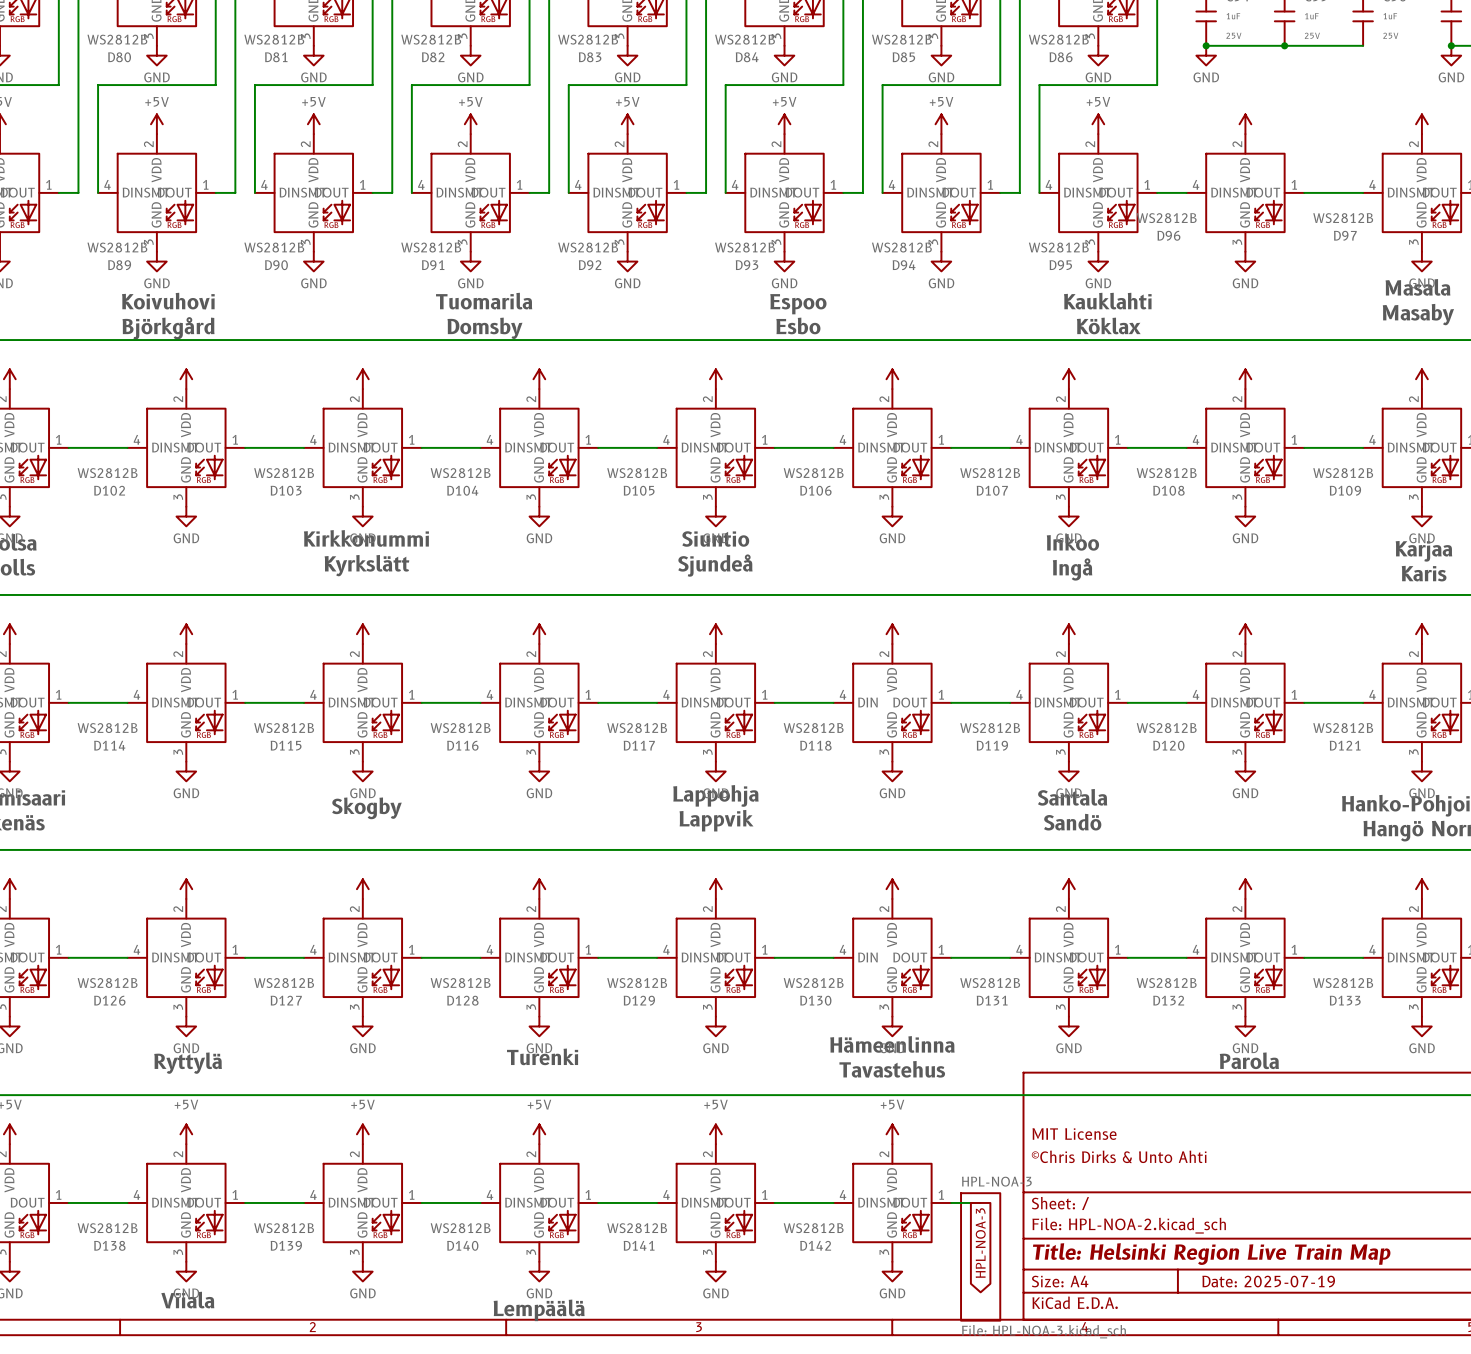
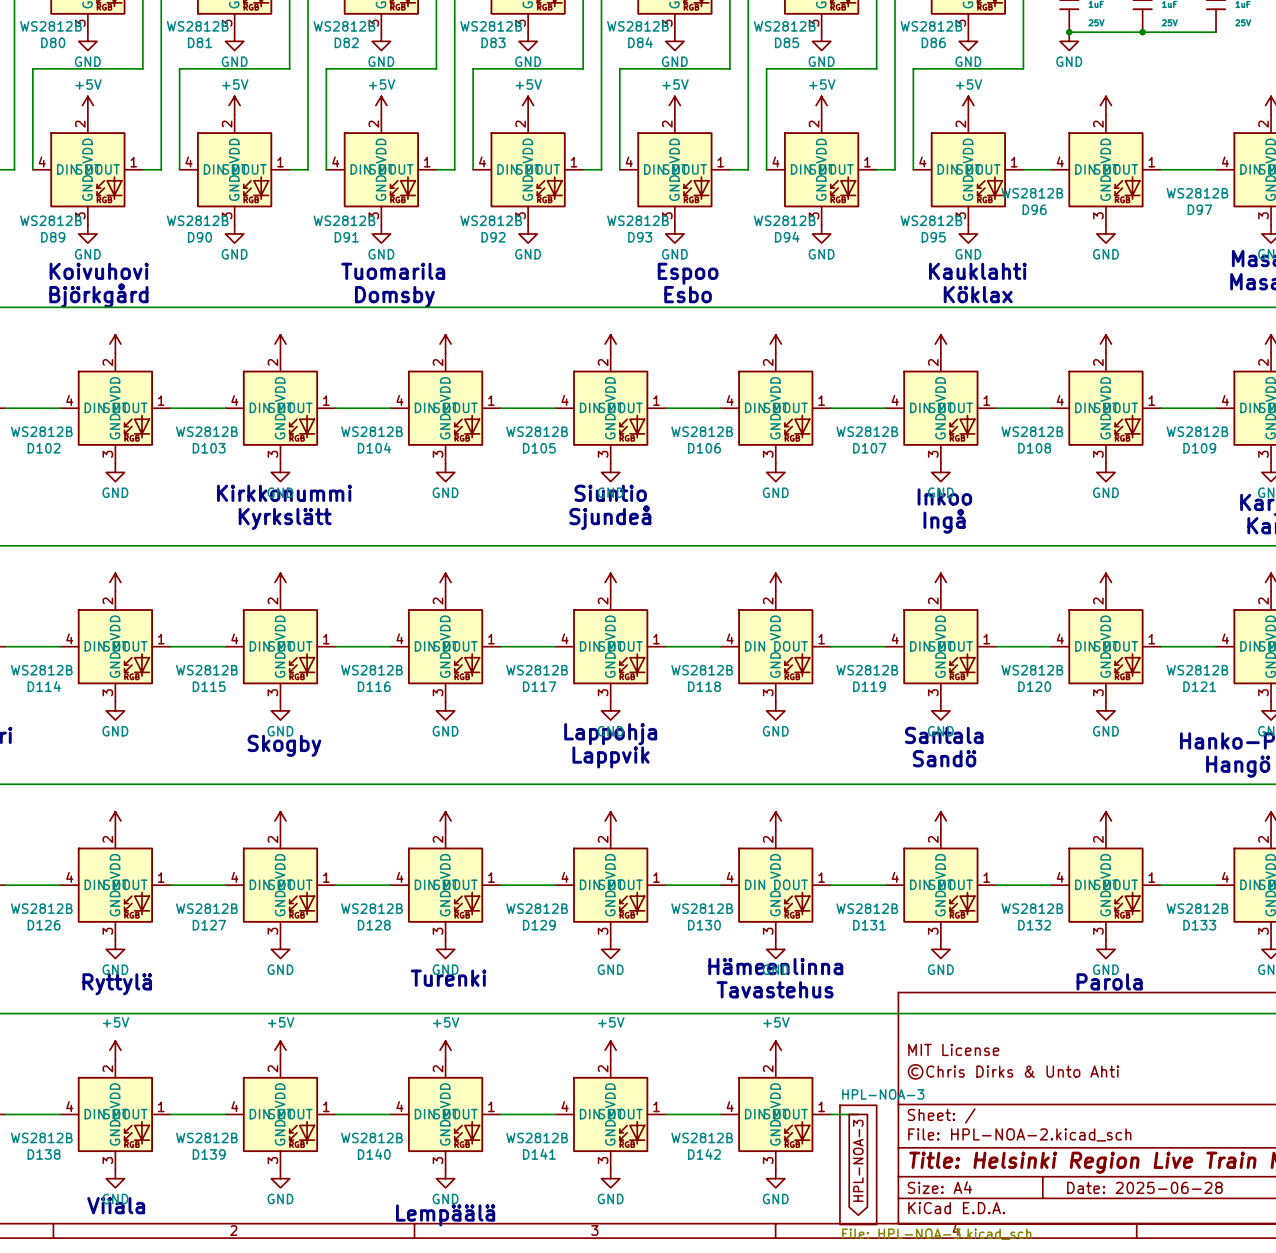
title block: Date: 2025-07-19 (1268, 1281) -> Date: 2025-06-28 (1144, 1187)

